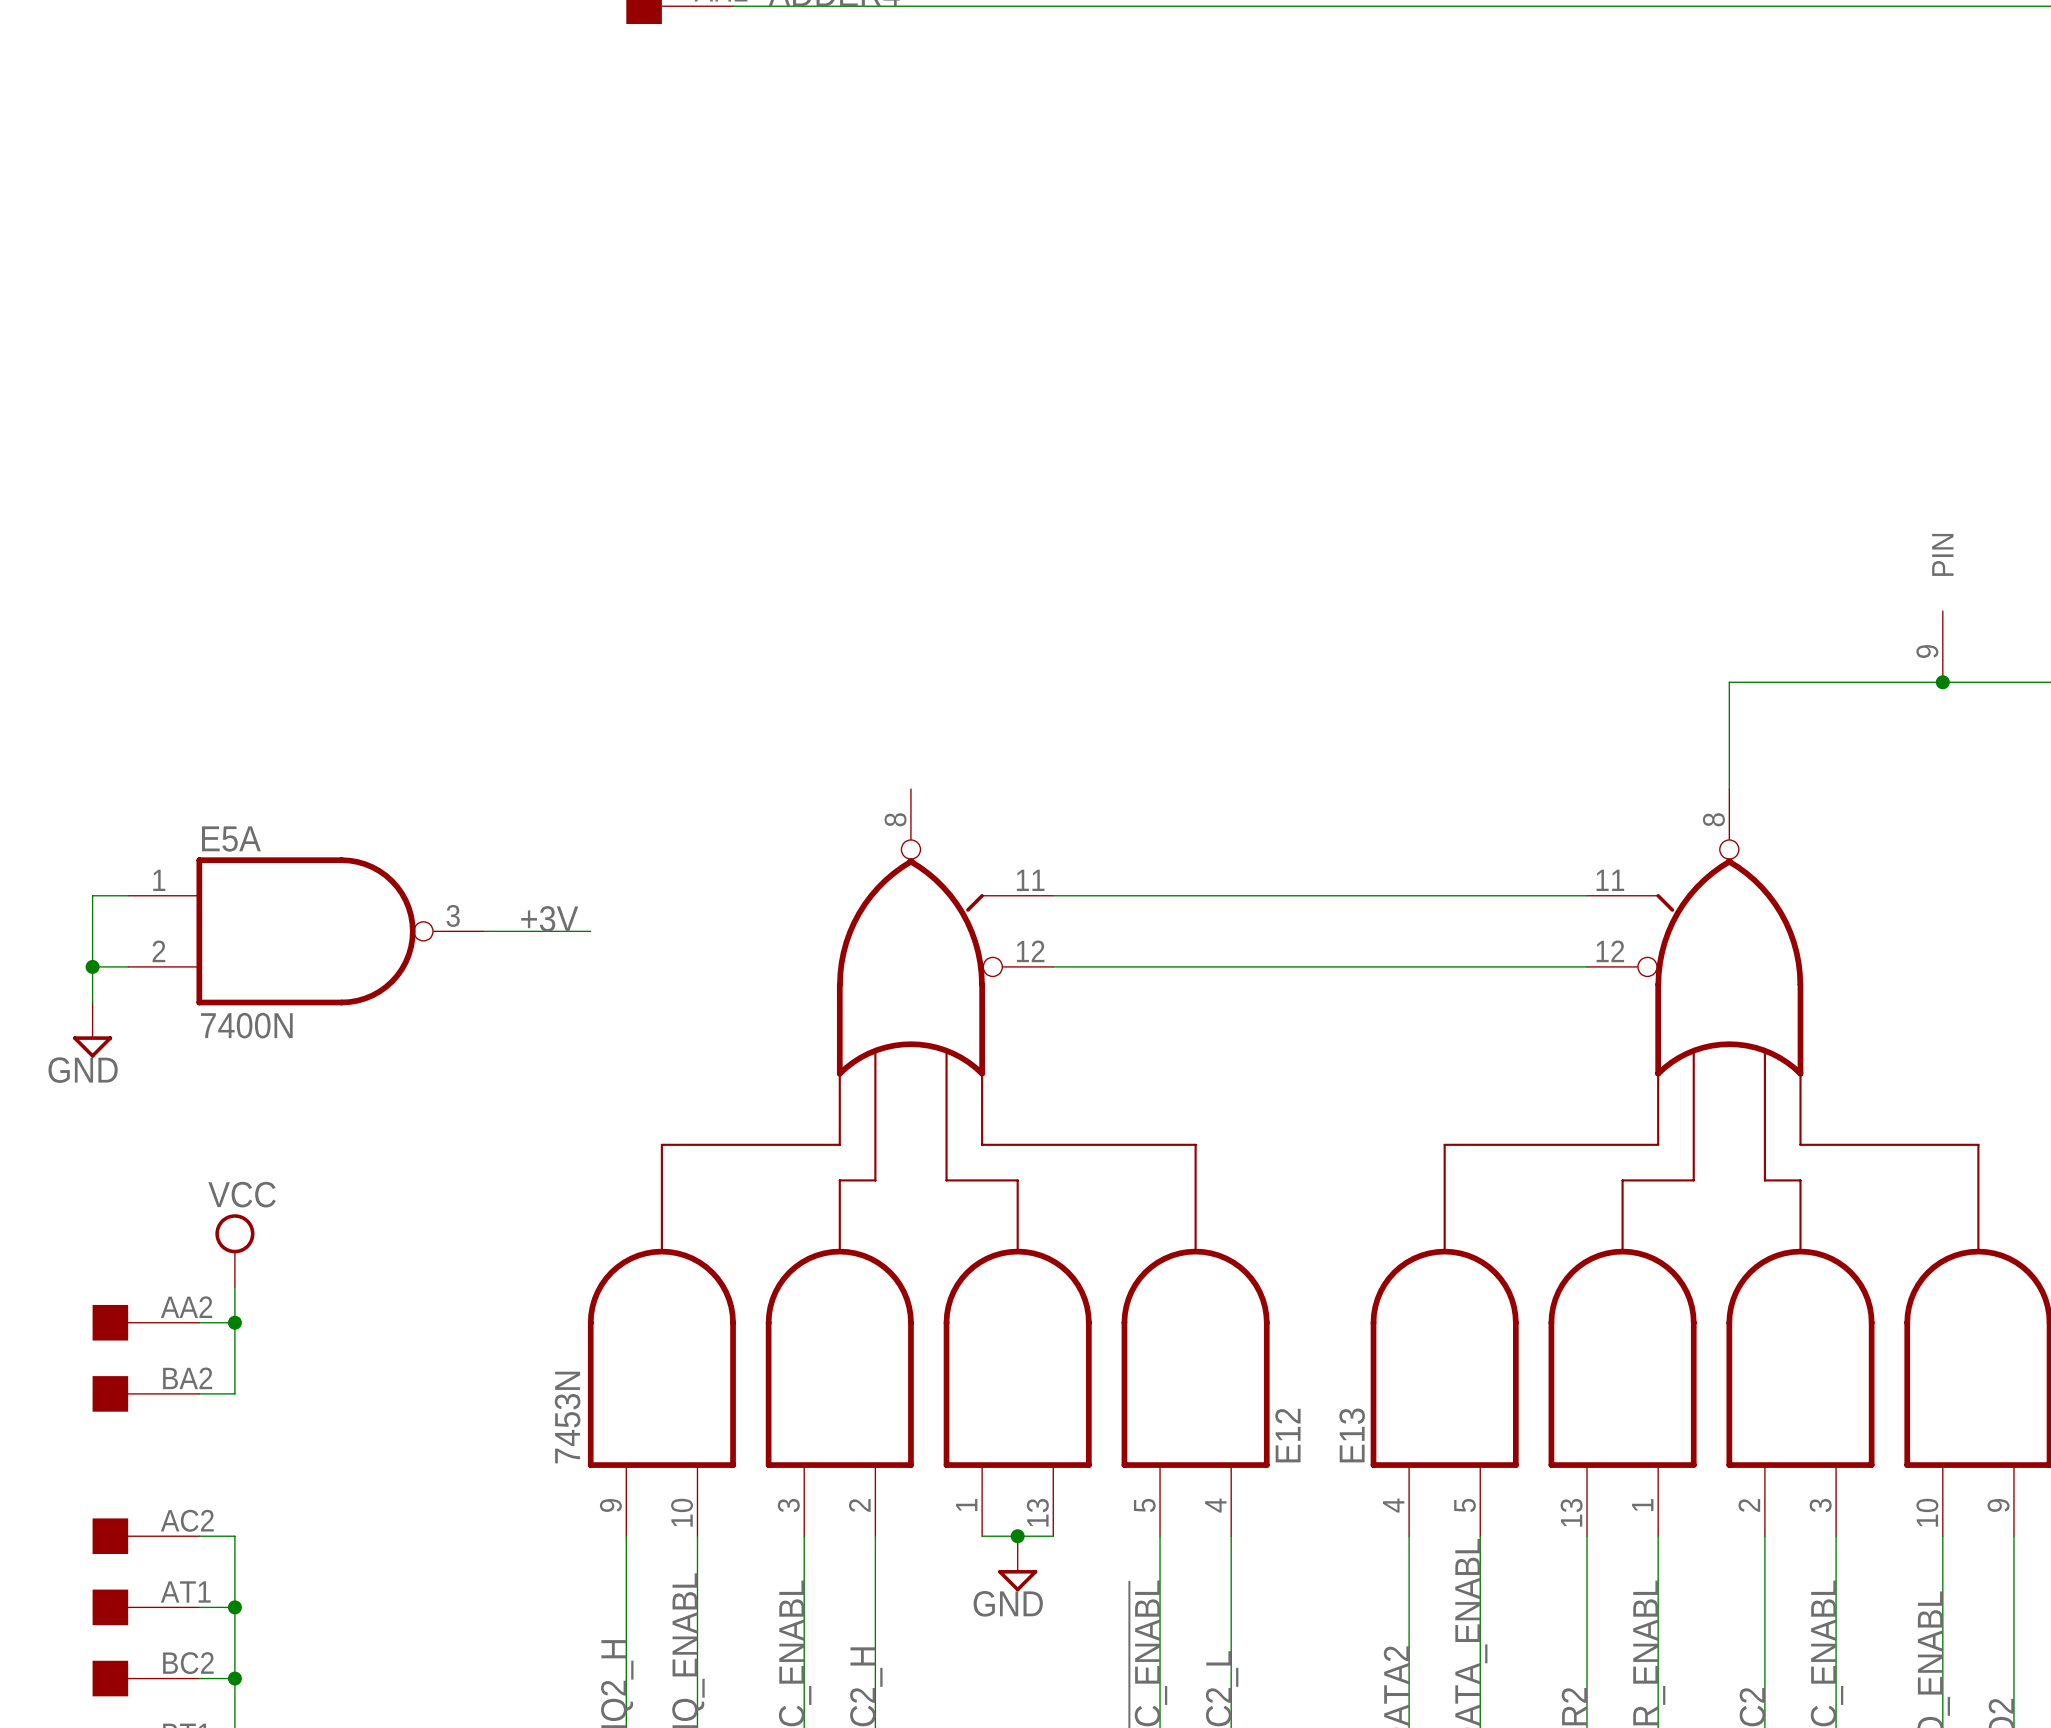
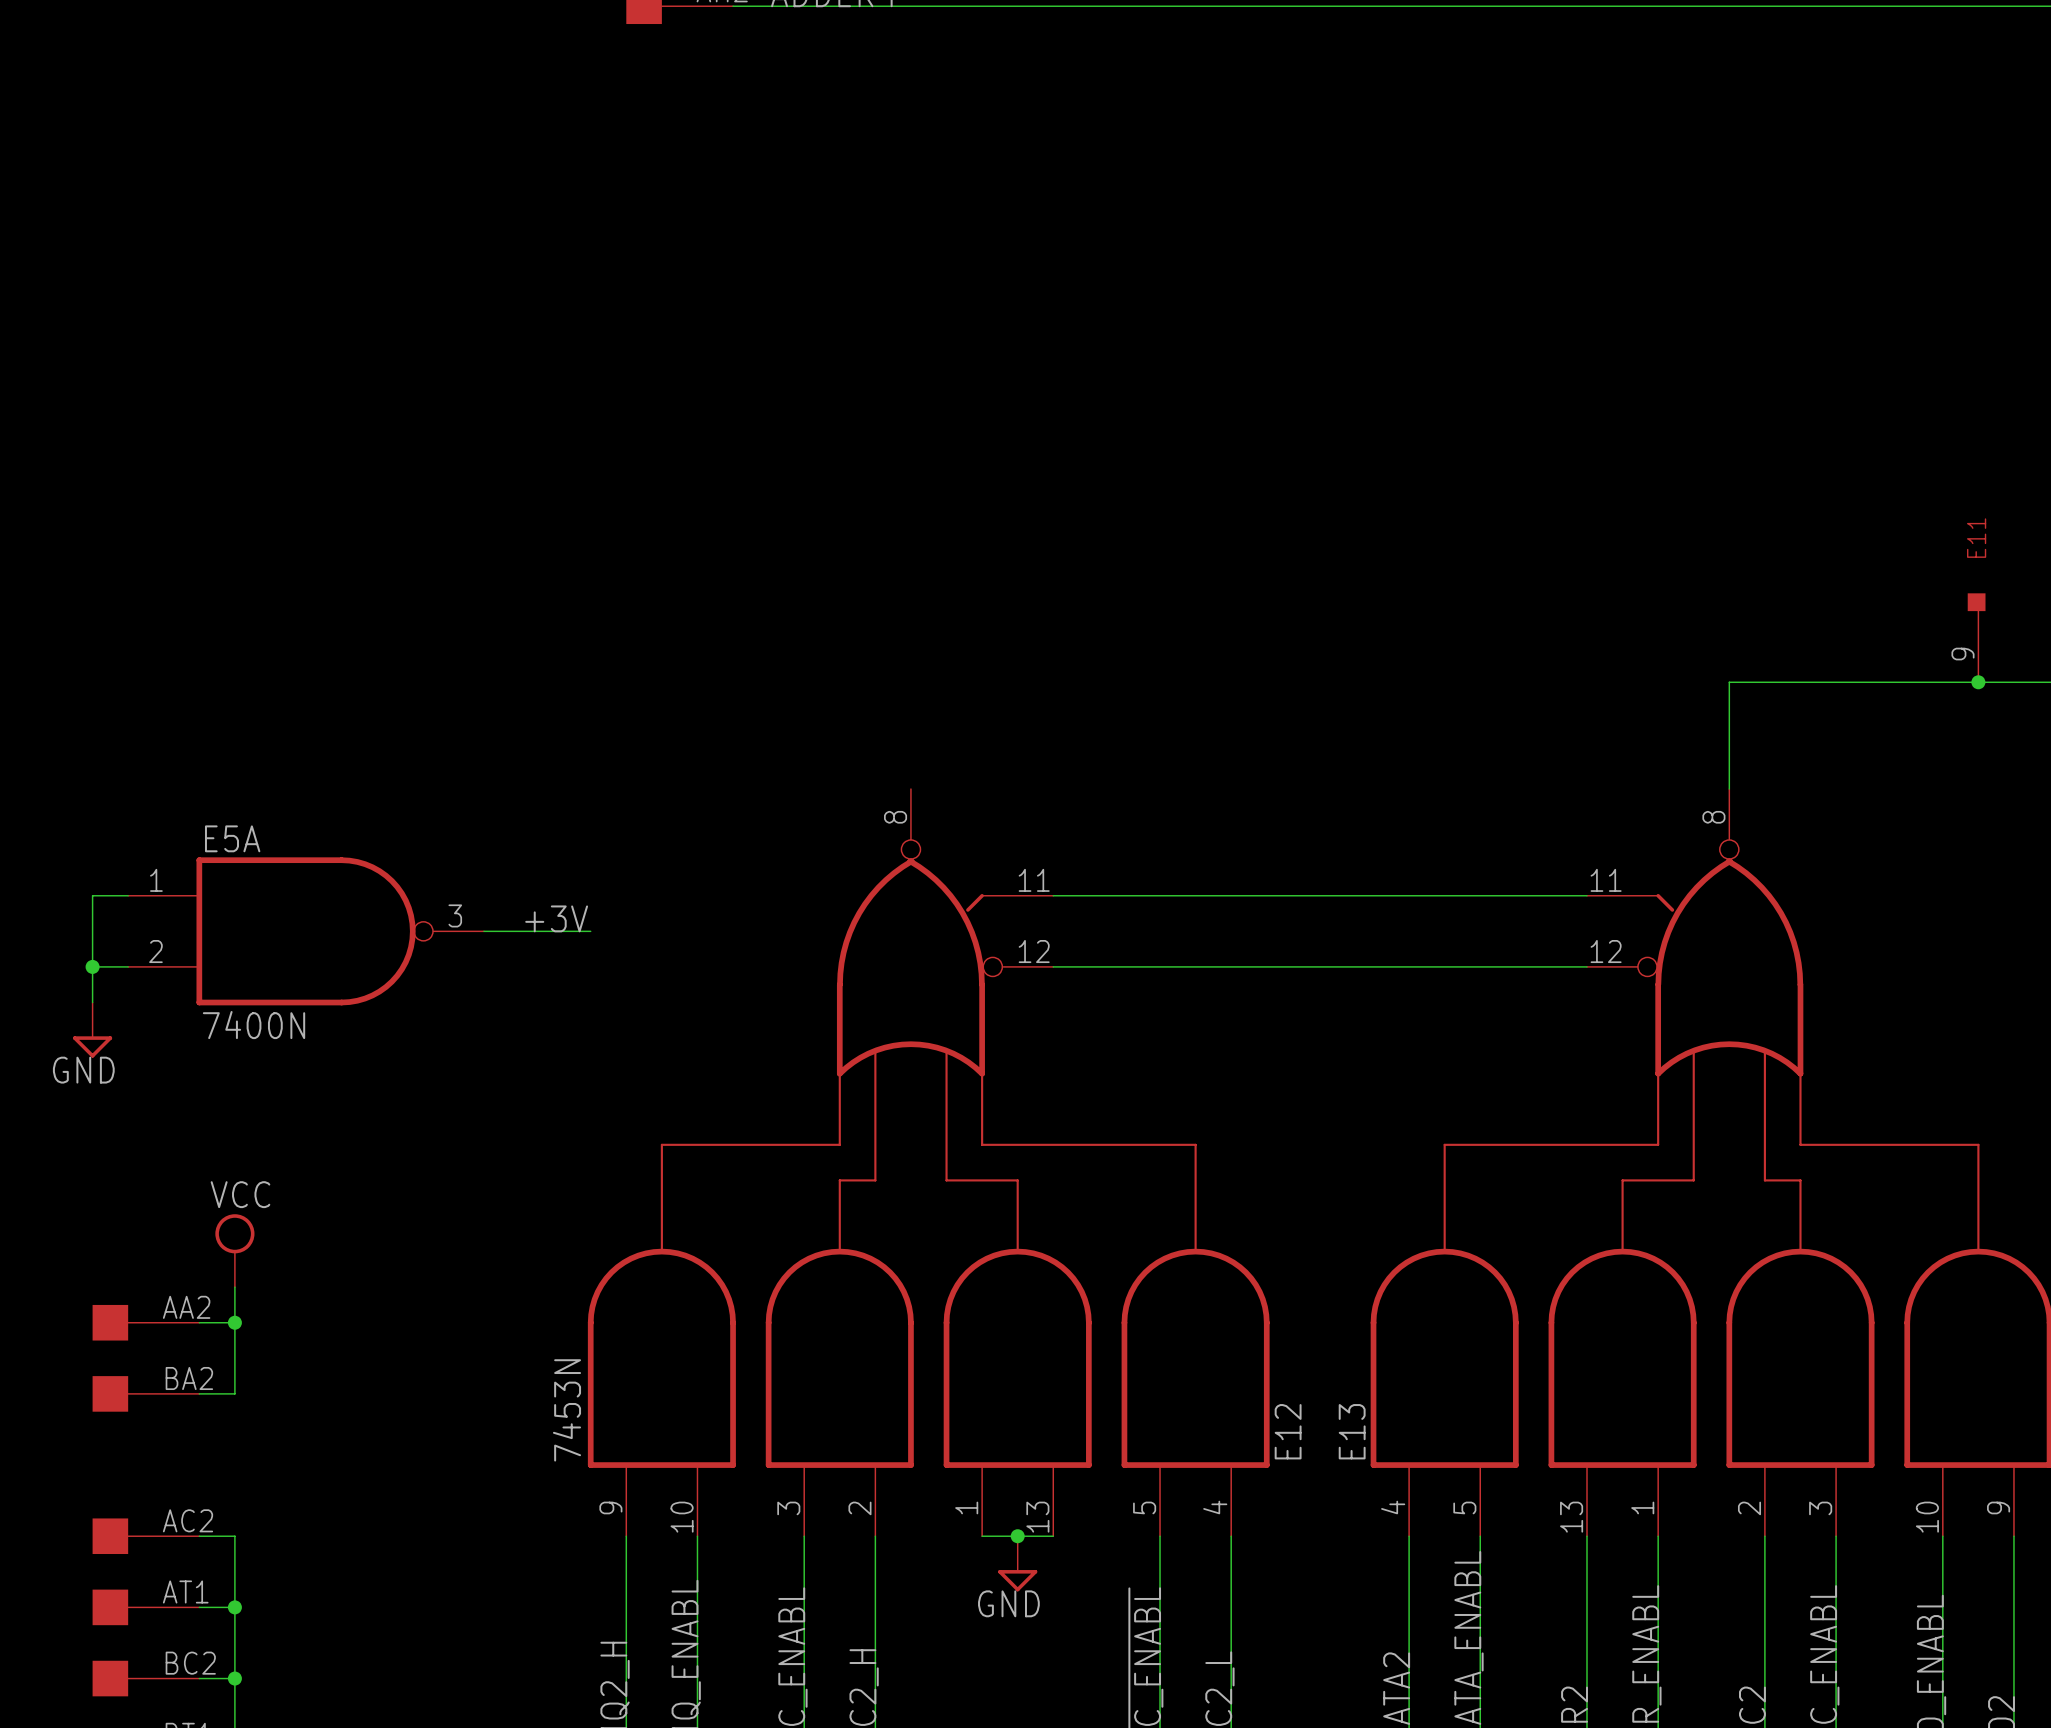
E11: none -> (1976, 637)
part: (1942, 646) -> none
junction position: (1942, 682) -> (1978, 682)

